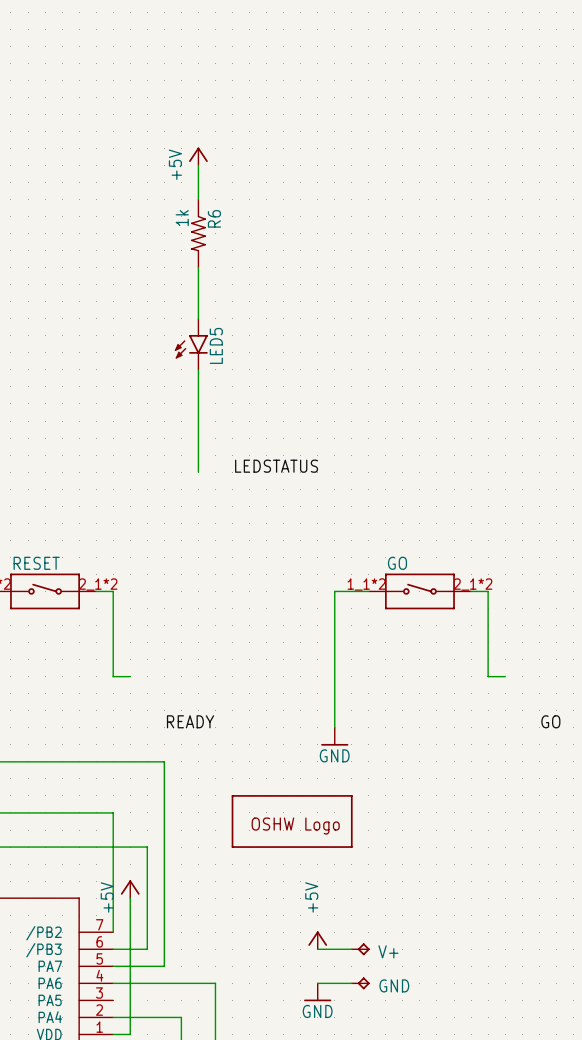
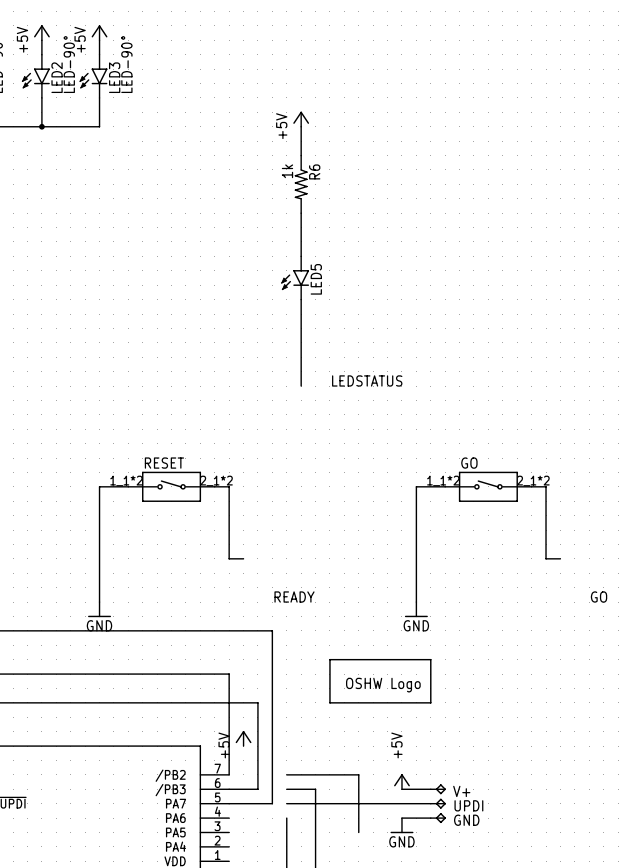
wire: (130, 898) (130, 1034) (113, 1034) -> none
wire: none -> (286, 774) (358, 774) (358, 832)
wire: none -> (286, 803) (430, 803)
UPDI: none -> (438, 803)
wire: (113, 983) (215, 983) -> (286, 789) (315, 789) (315, 818)
wire: (113, 1017) (181, 1017) -> (286, 818) (286, 846)

